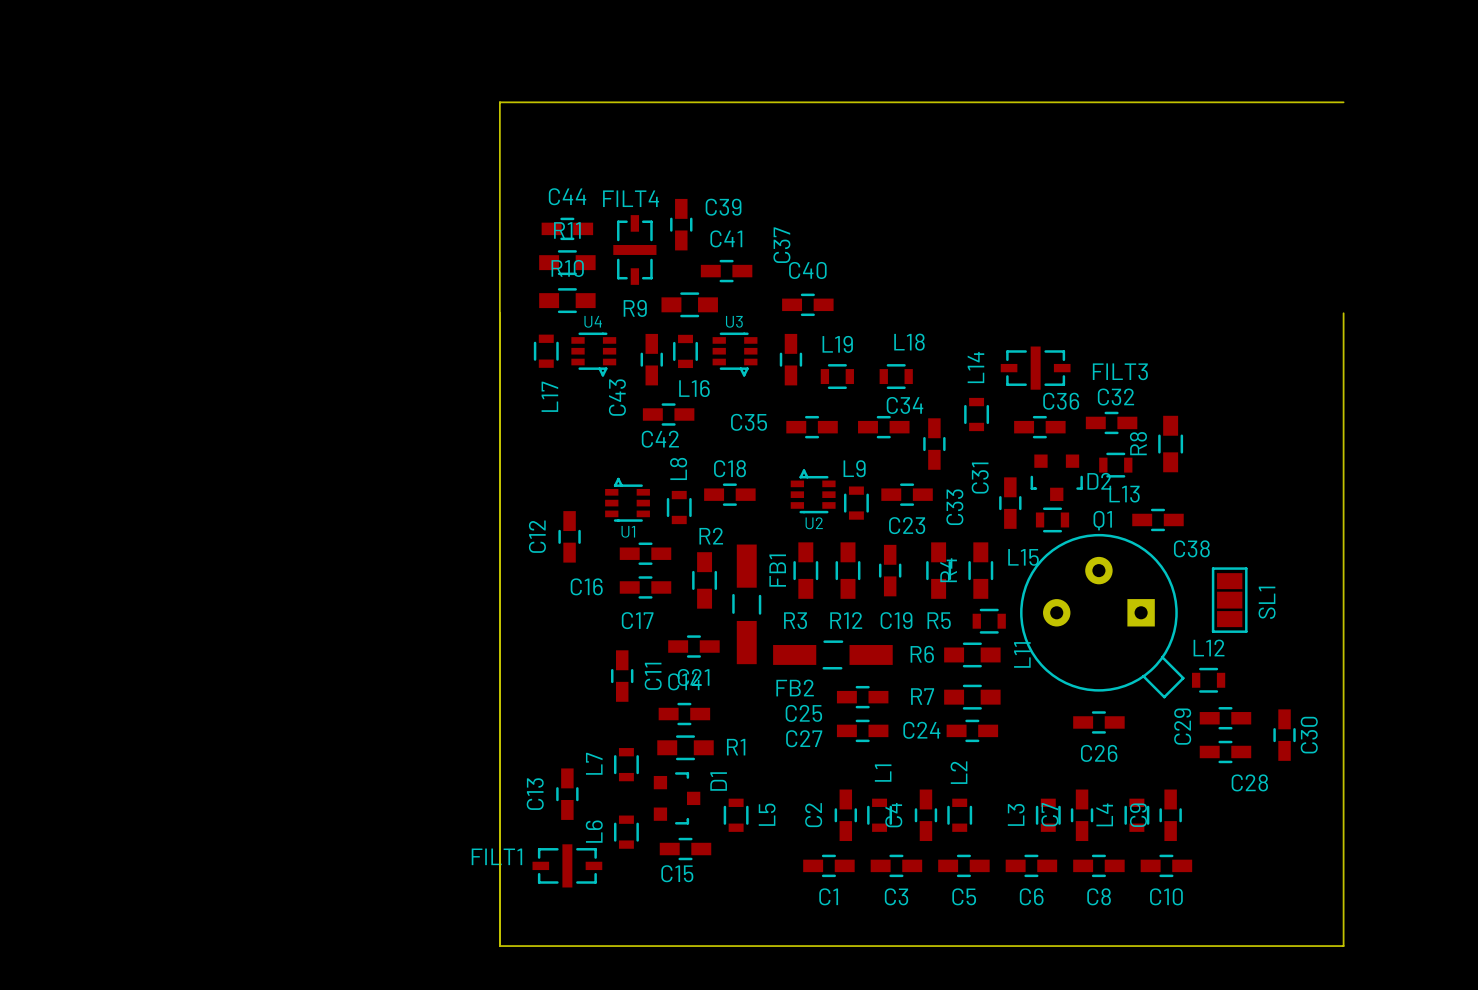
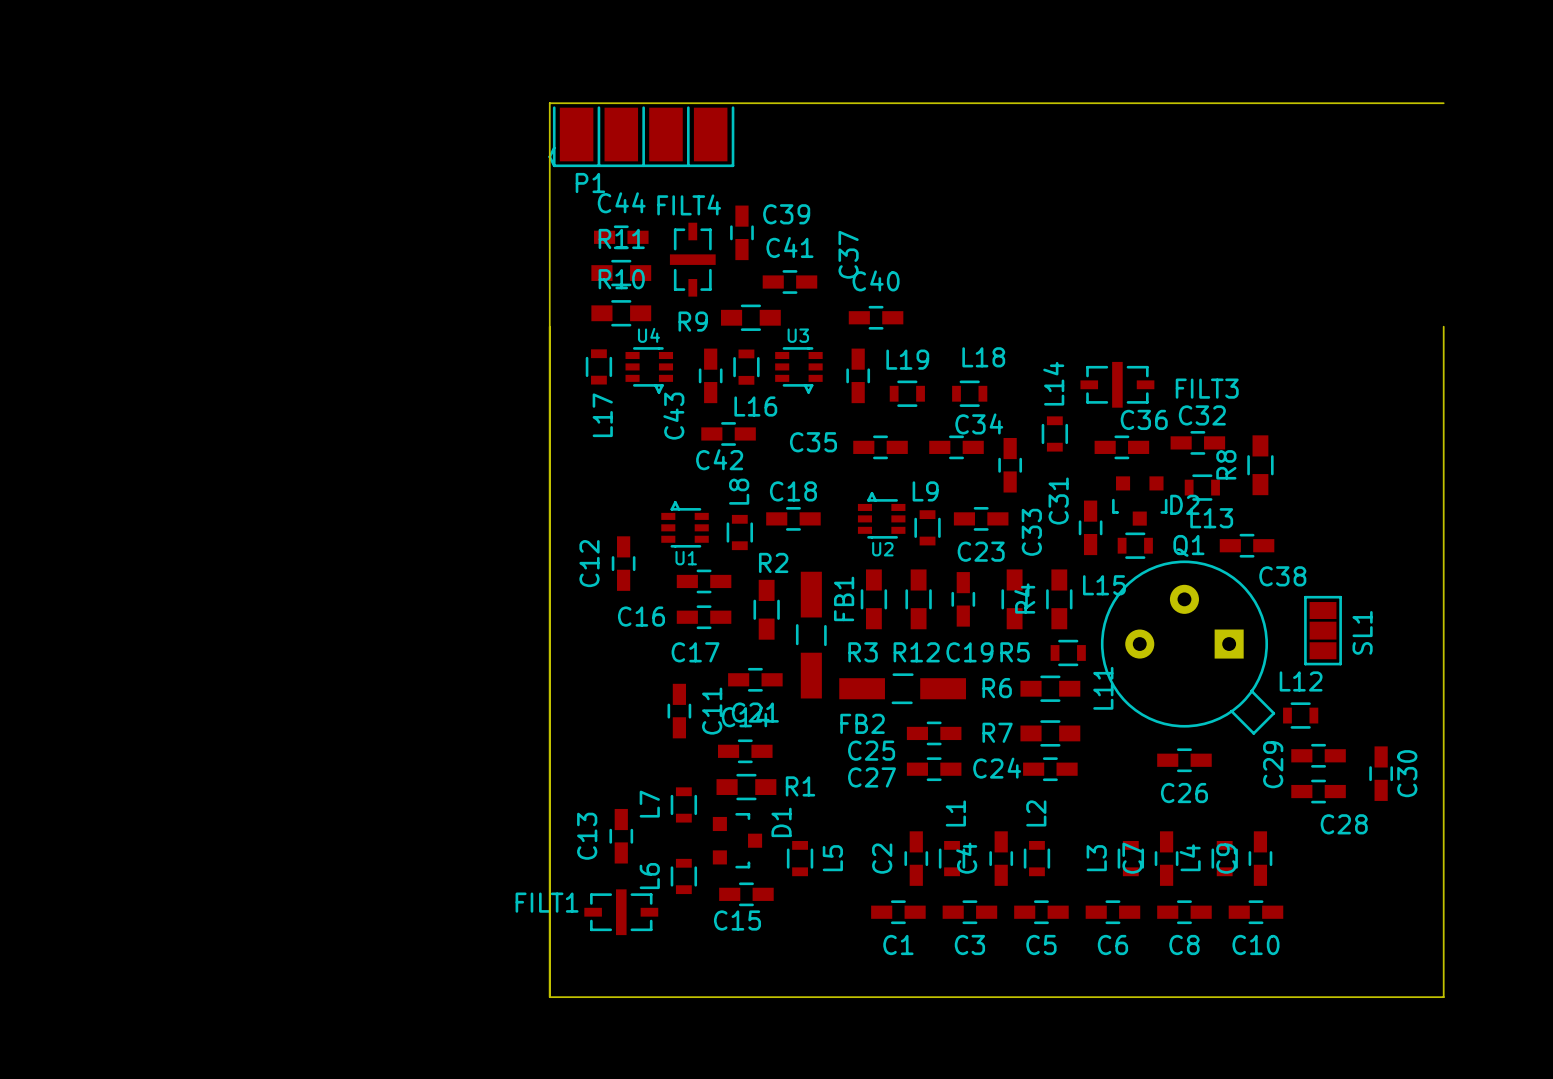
P1: none -> (641, 136)

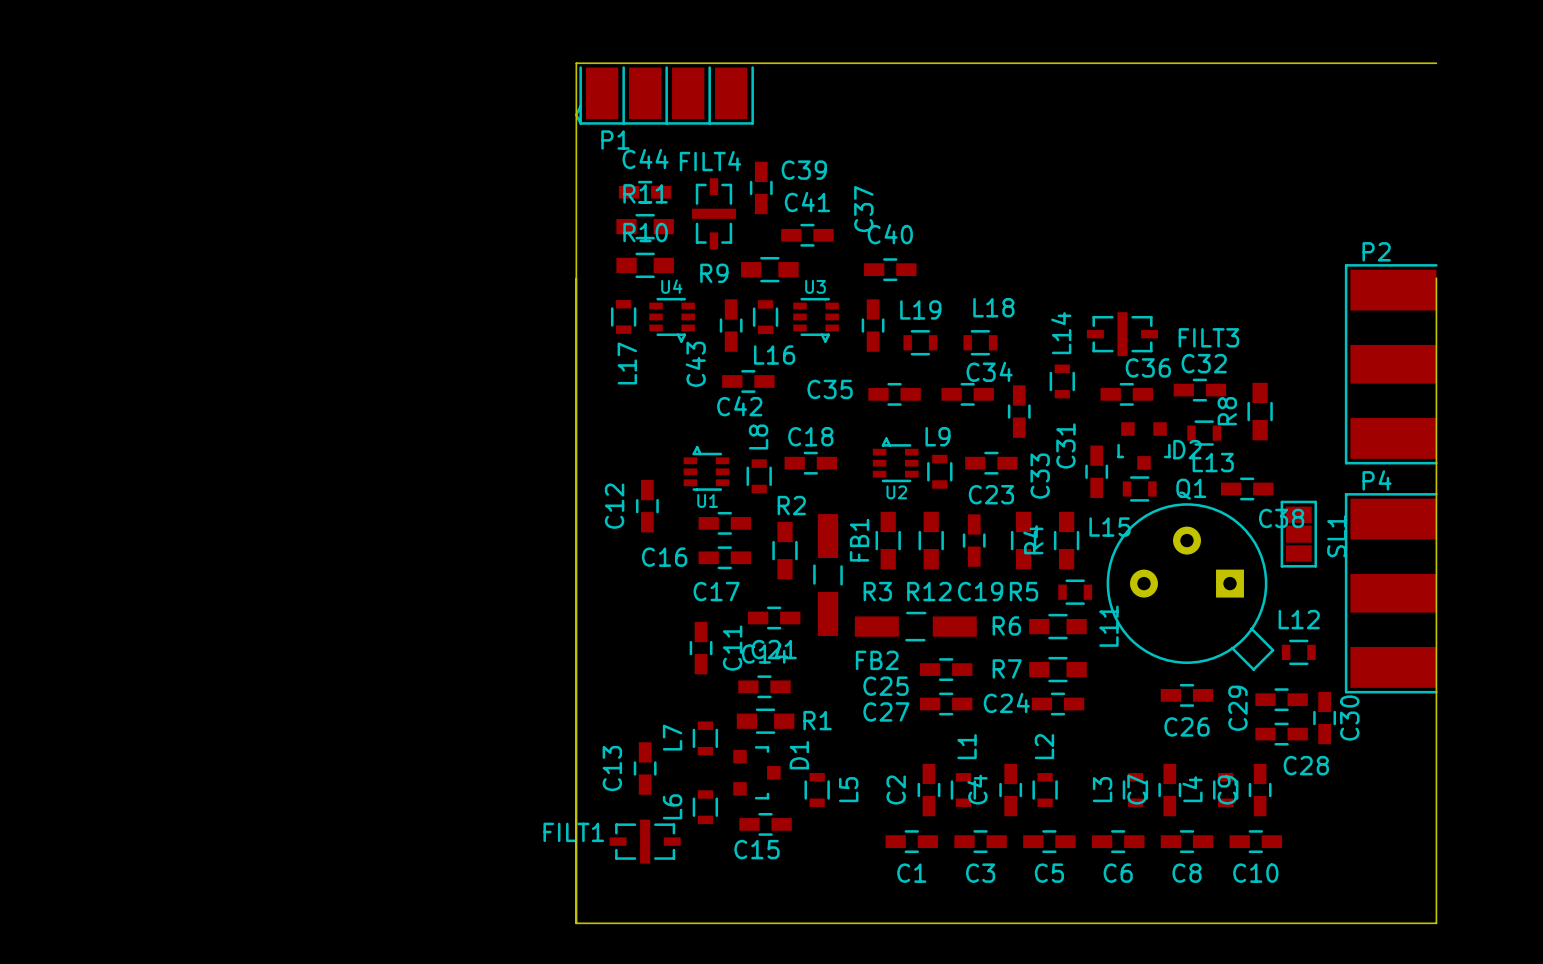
P2: none -> (1391, 364)
SL1 position: (1323, 630) -> (1298, 534)
P4: none -> (1391, 593)
C29 position: (1318, 755) -> (1281, 699)
C30 position: (1381, 773) -> (1324, 718)
C28 position: (1318, 791) -> (1281, 734)

